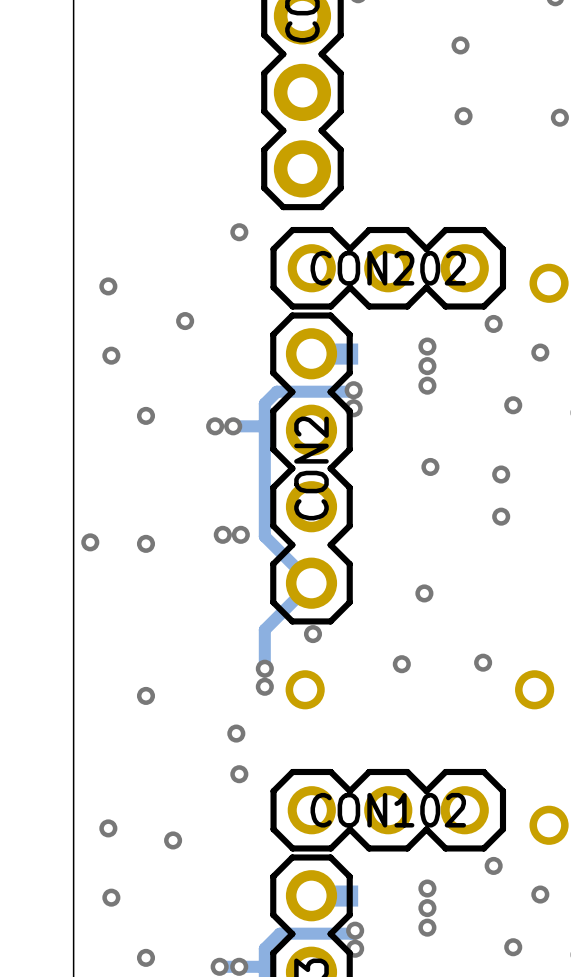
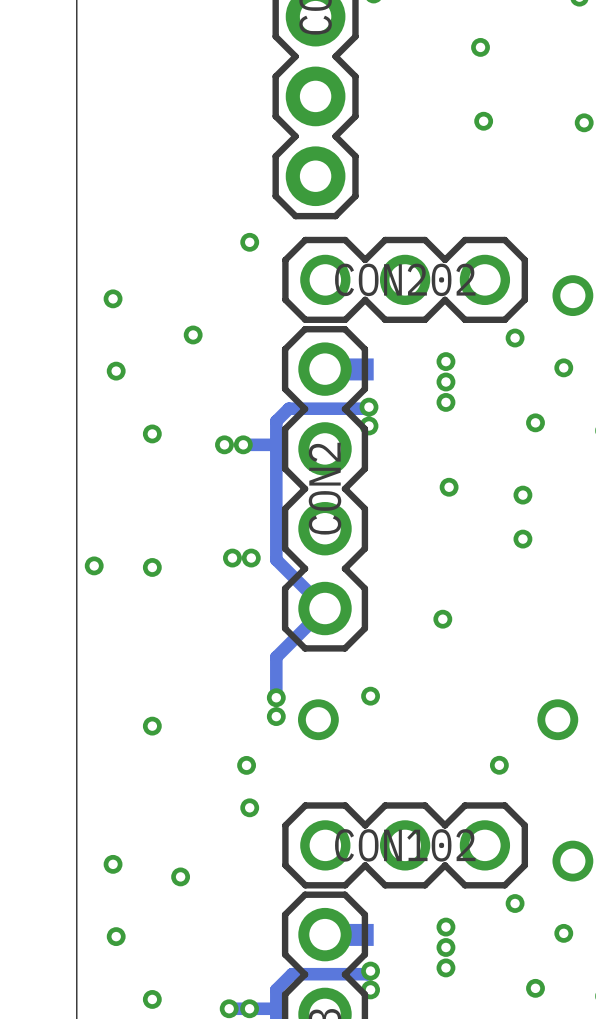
via: (312, 634) -> none
via: (483, 662) -> none
via: (401, 664) -> none
via: none -> (370, 696)
via: none -> (499, 765)

